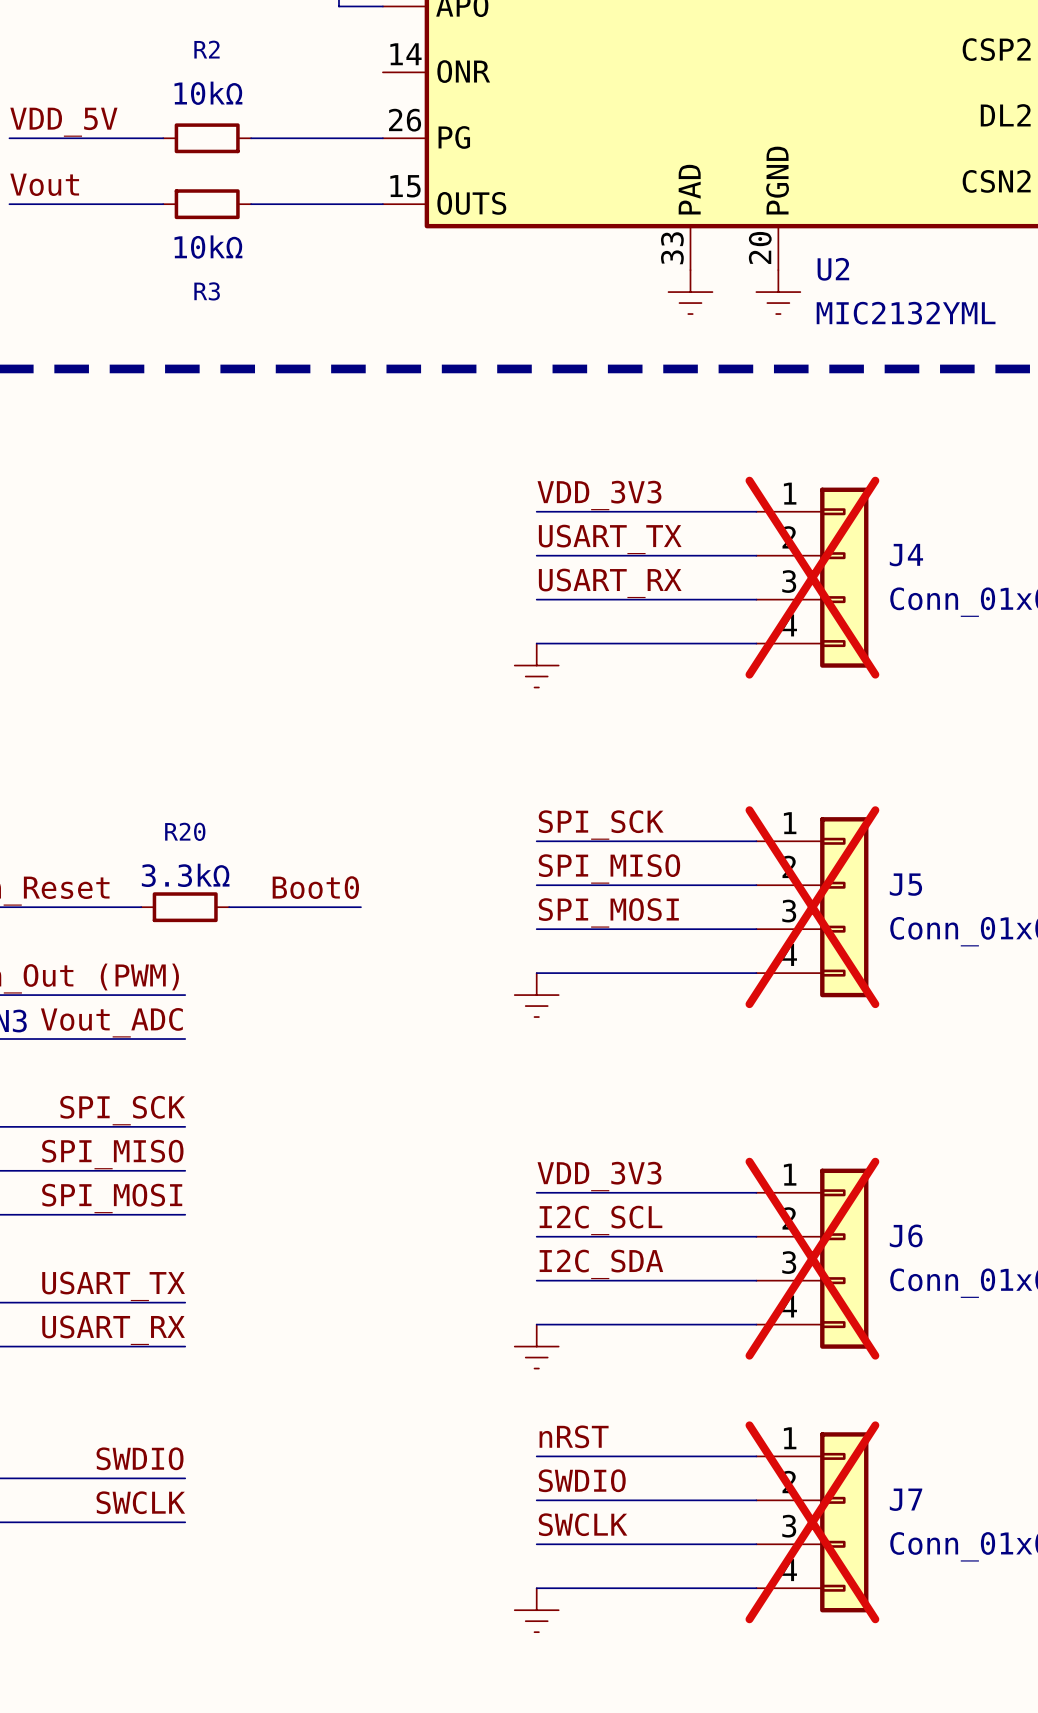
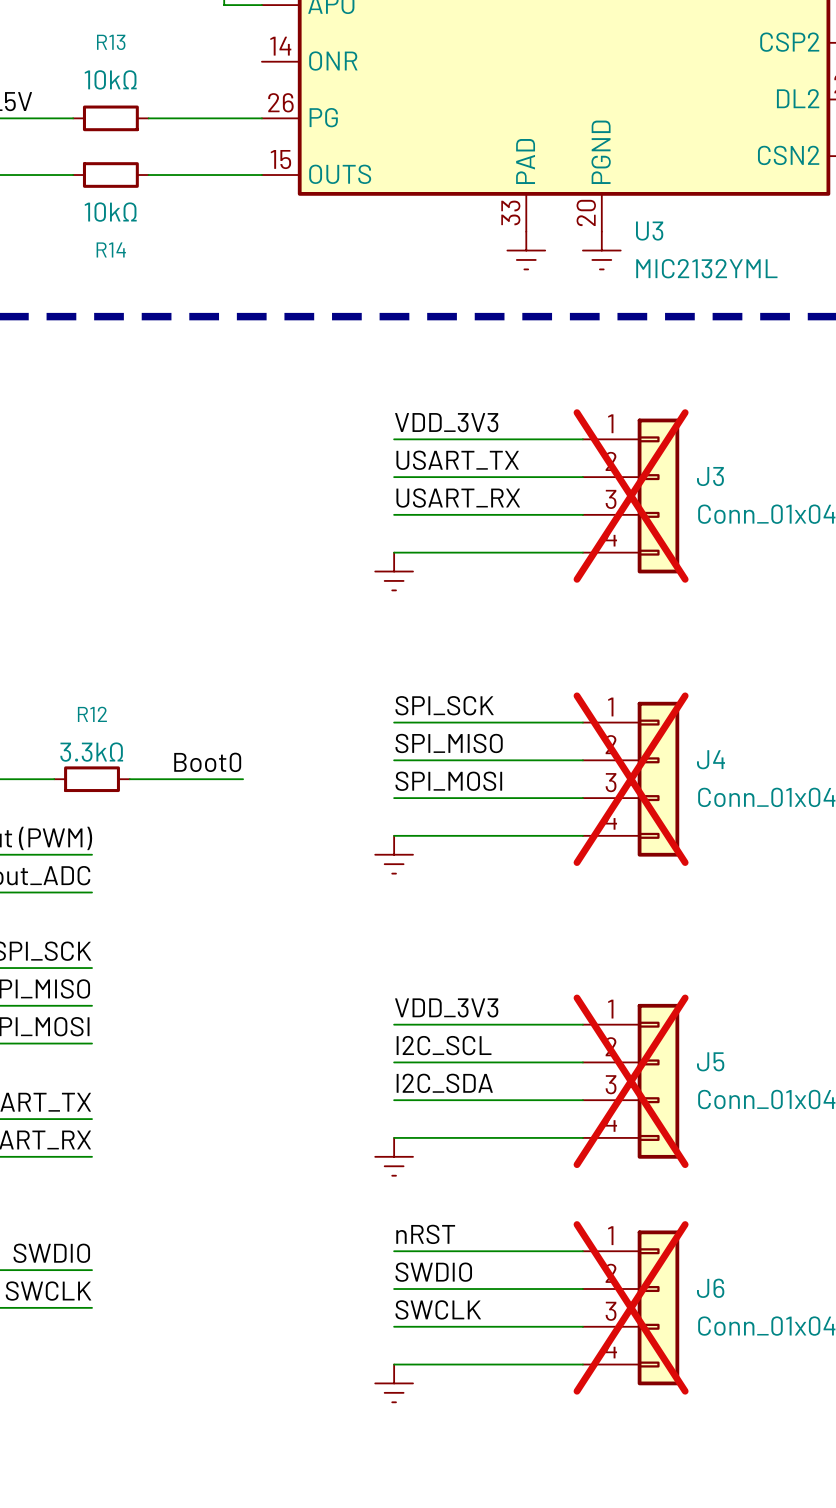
R2 name: R2 (206, 49) -> R13 (111, 42)
U2 name: U2 (833, 269) -> U3 (649, 231)
R3 name: R3 (207, 291) -> R14 (111, 249)
J4 name: J4 (906, 555) -> J3 (710, 476)
R20 name: R20 (185, 831) -> R12 (92, 714)
J5 name: J5 (905, 884) -> J4 (711, 759)
J6 name: J6 (906, 1235) -> J5 (710, 1061)
J7 name: J7 (906, 1499) -> J6 (710, 1288)

